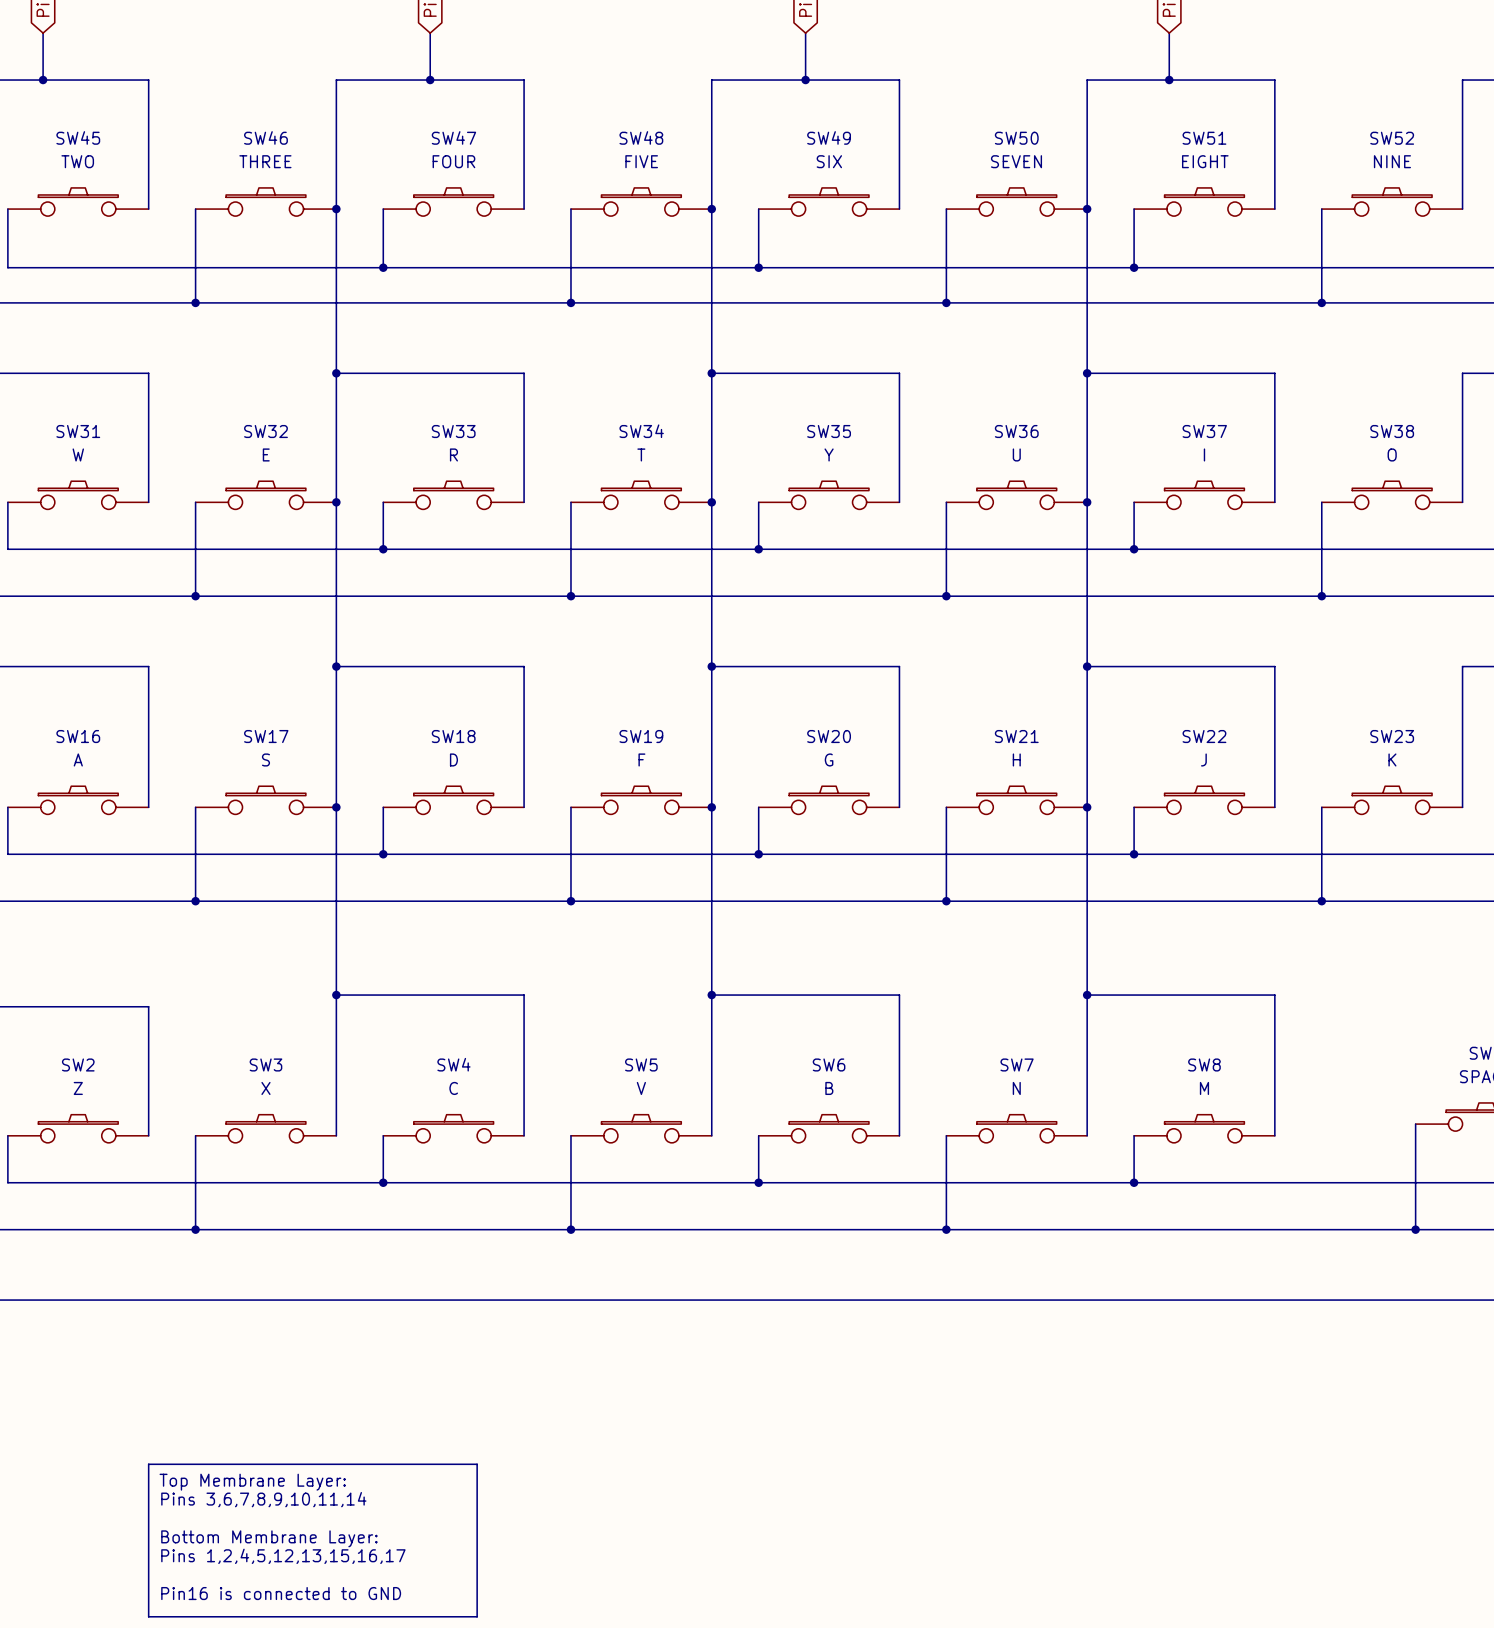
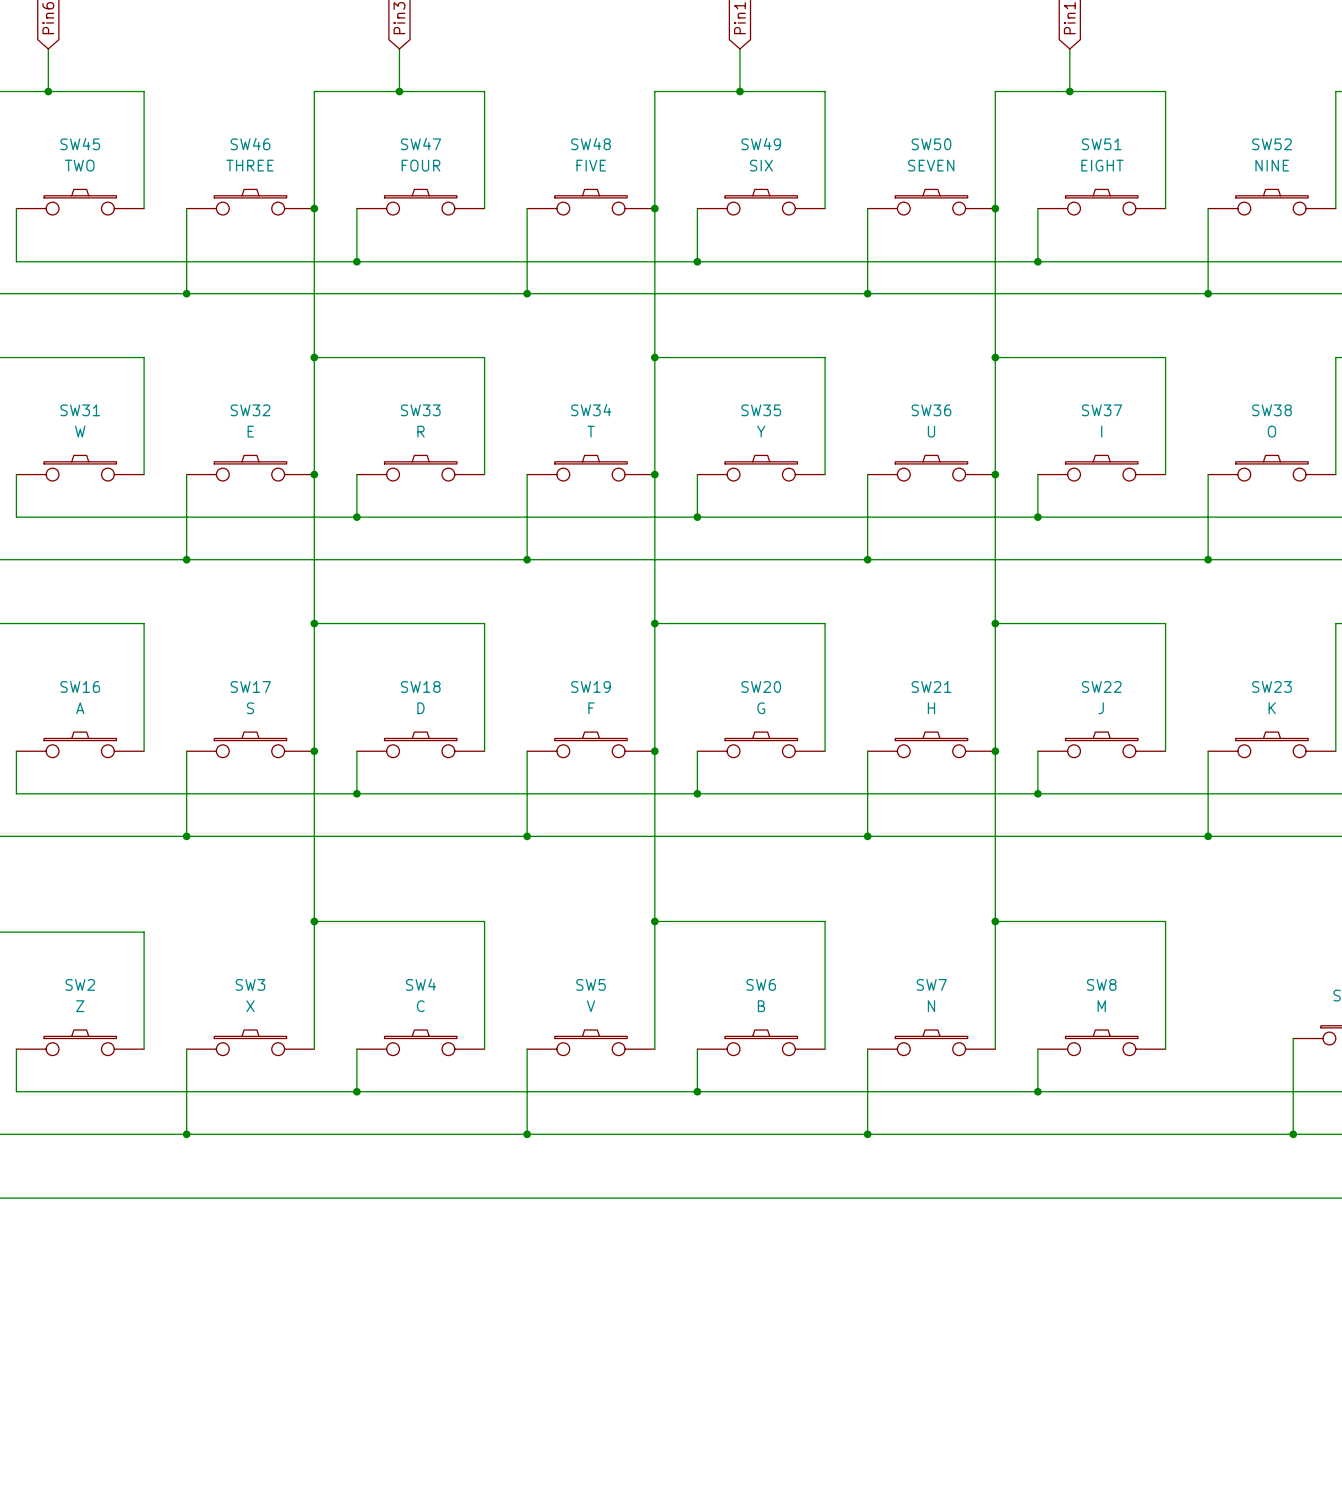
line: (148, 1464) (477, 1464) (477, 1616) (148, 1616) (148, 1464) -> none
text: Top Membrane Layer: (252, 1482) -> none
text: Pins 3,6,7,8,9,10,11,14 (263, 1499) -> none
text: Bottom Membrane Layer: (269, 1538) -> none
text: Pins 1,2,4,5,12,13,15,16,17 (283, 1556) -> none
text: Pin16 is connected to GND (281, 1593) -> none

